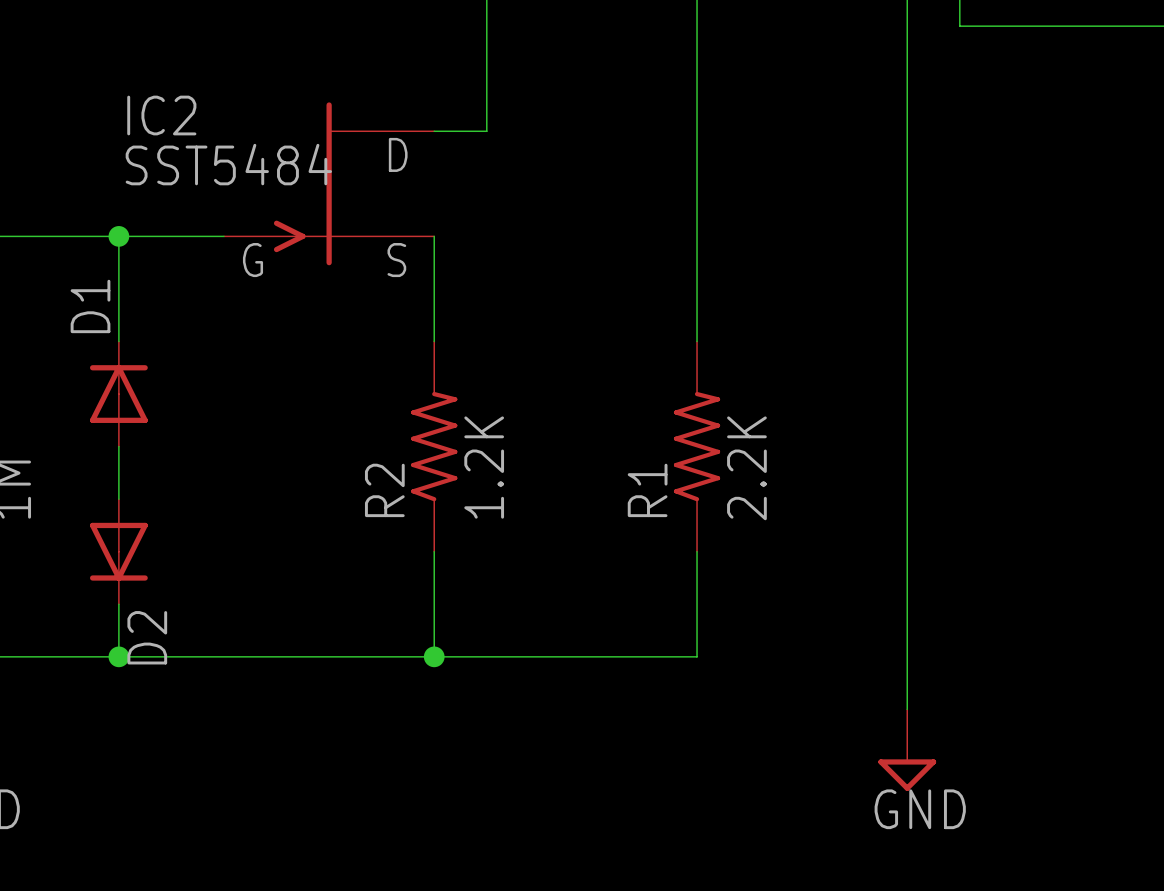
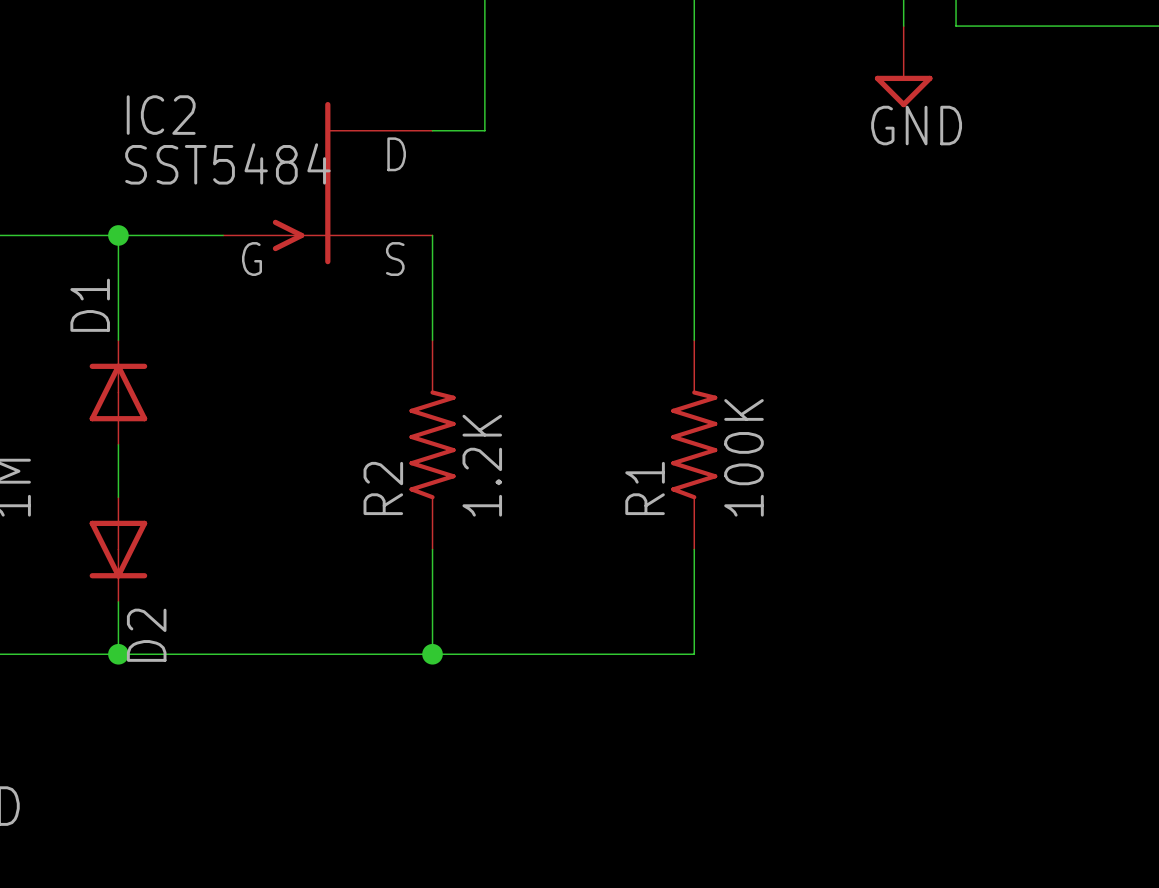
wire: (907, 26) (907, 709) -> none
power symbol: none -> GND (903, 66)
R1 value: 2.2K (746, 468) -> 100K (744, 457)
power symbol: GND (907, 750) -> none

